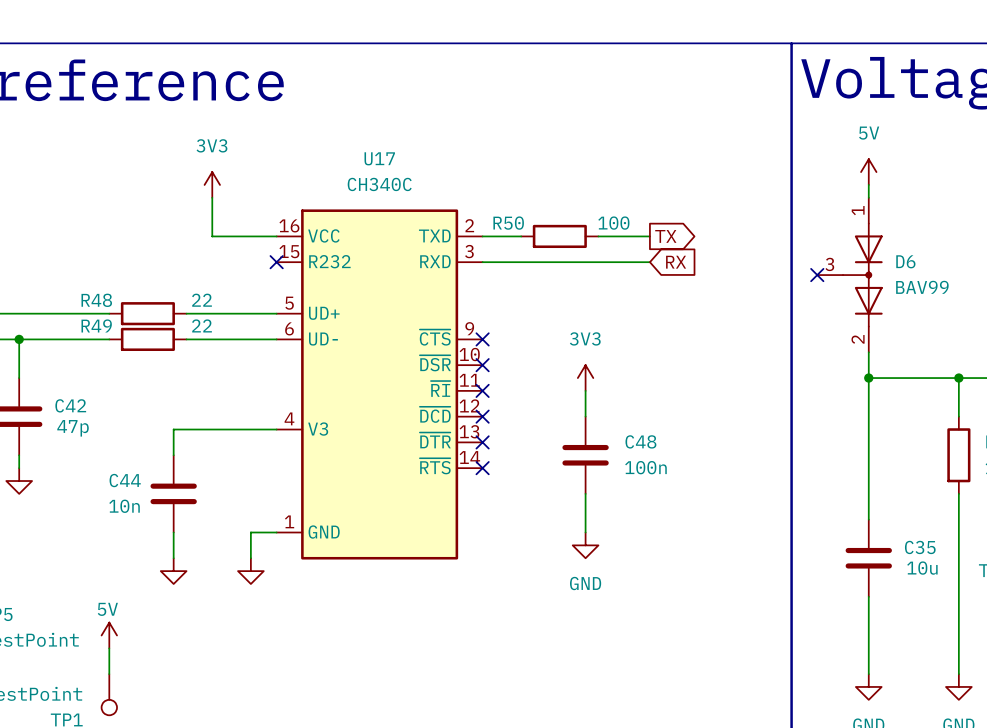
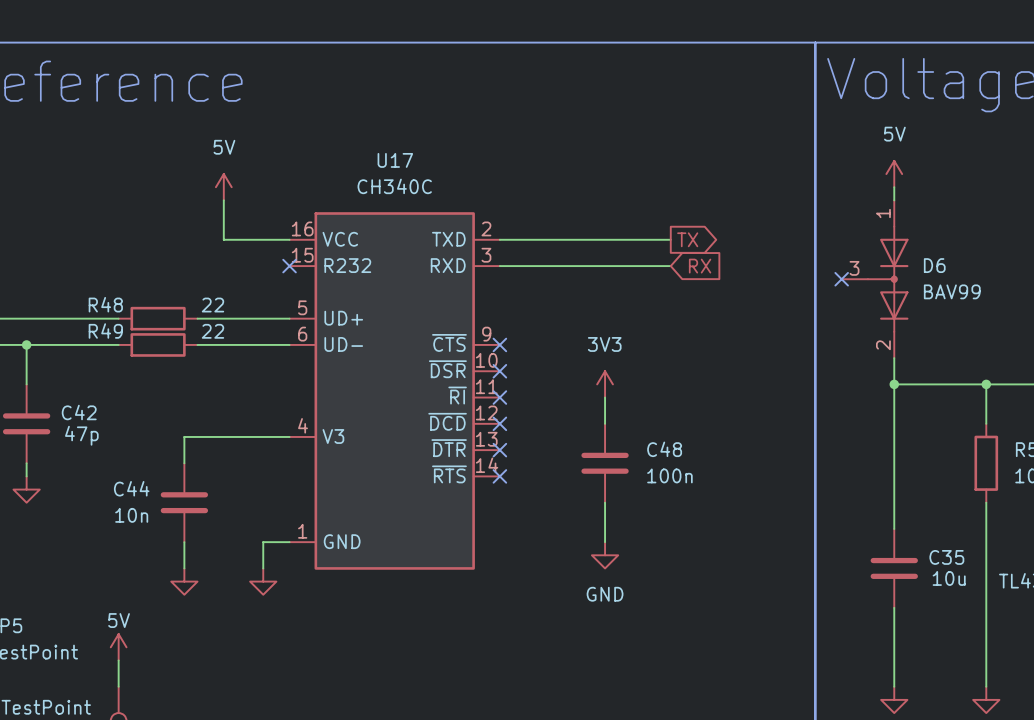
power symbol: 3V3 (212, 184) -> 5V (223, 187)
wire: none -> (539, 239) (618, 239)
R50: 100 (559, 236) -> none

